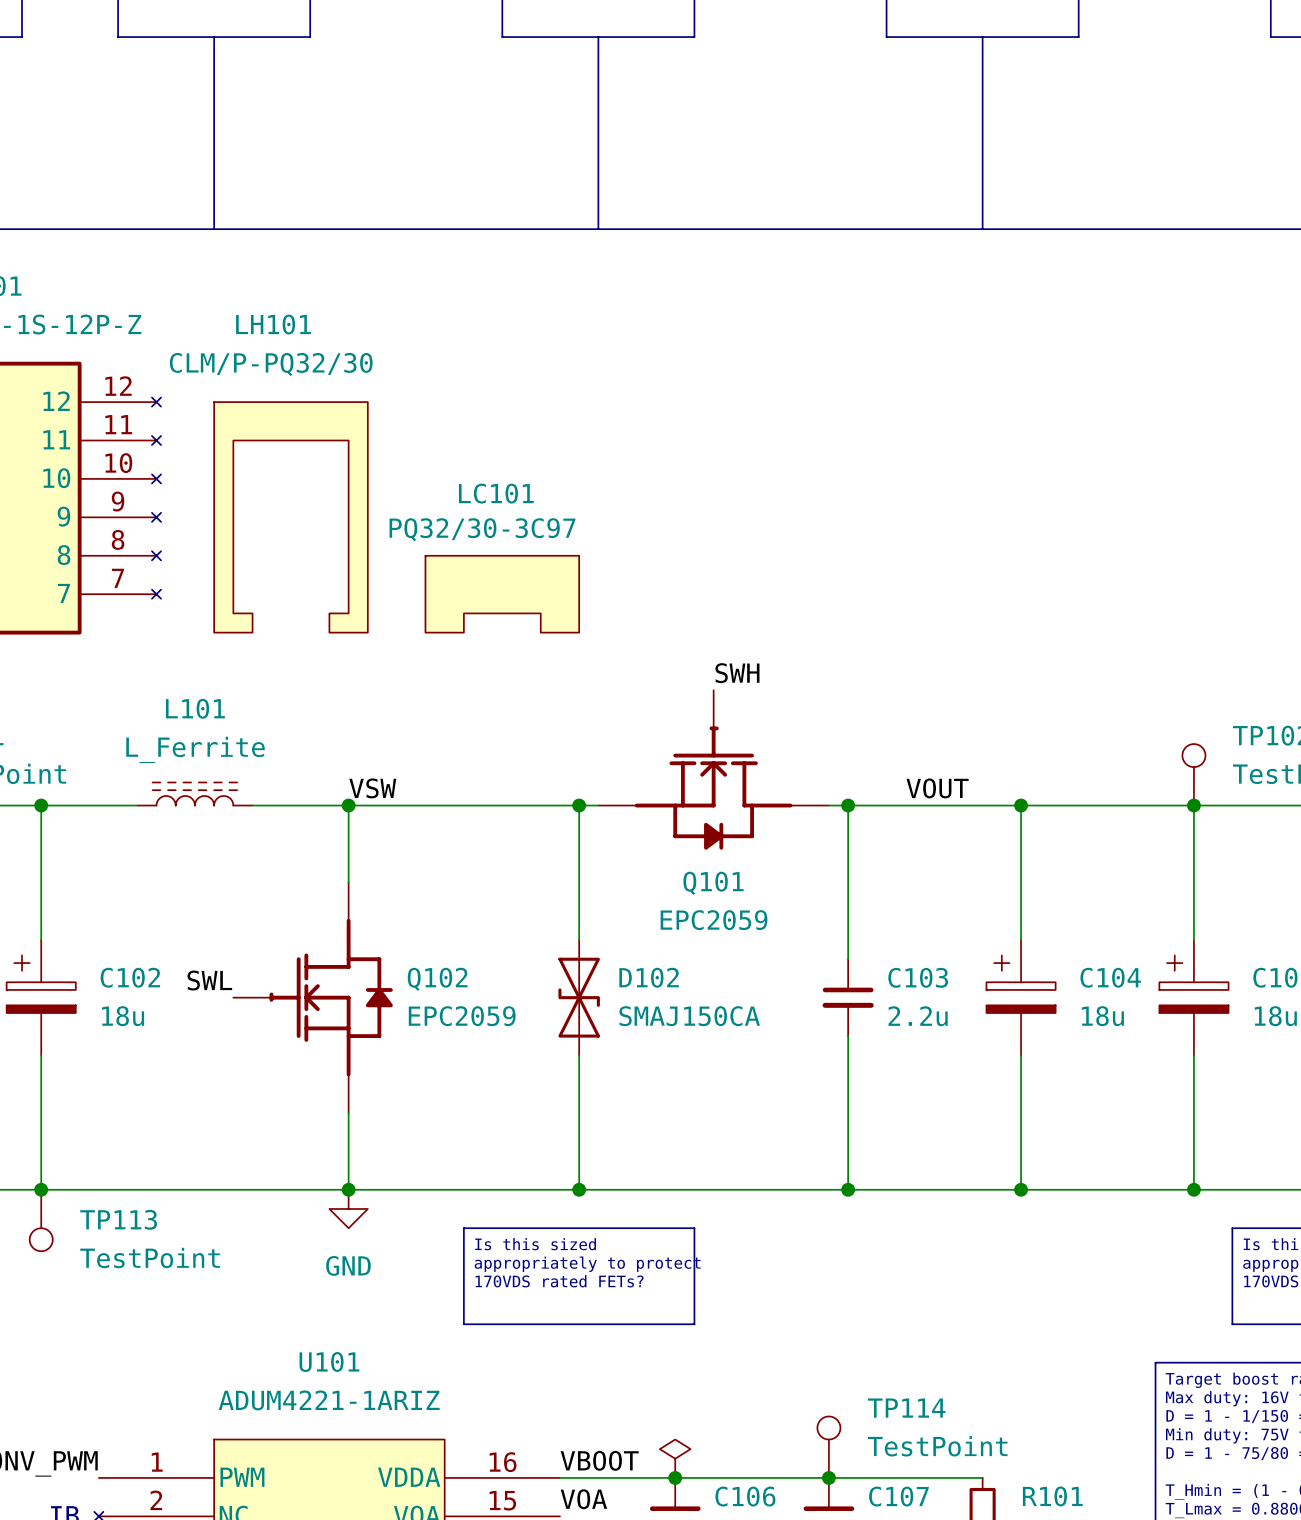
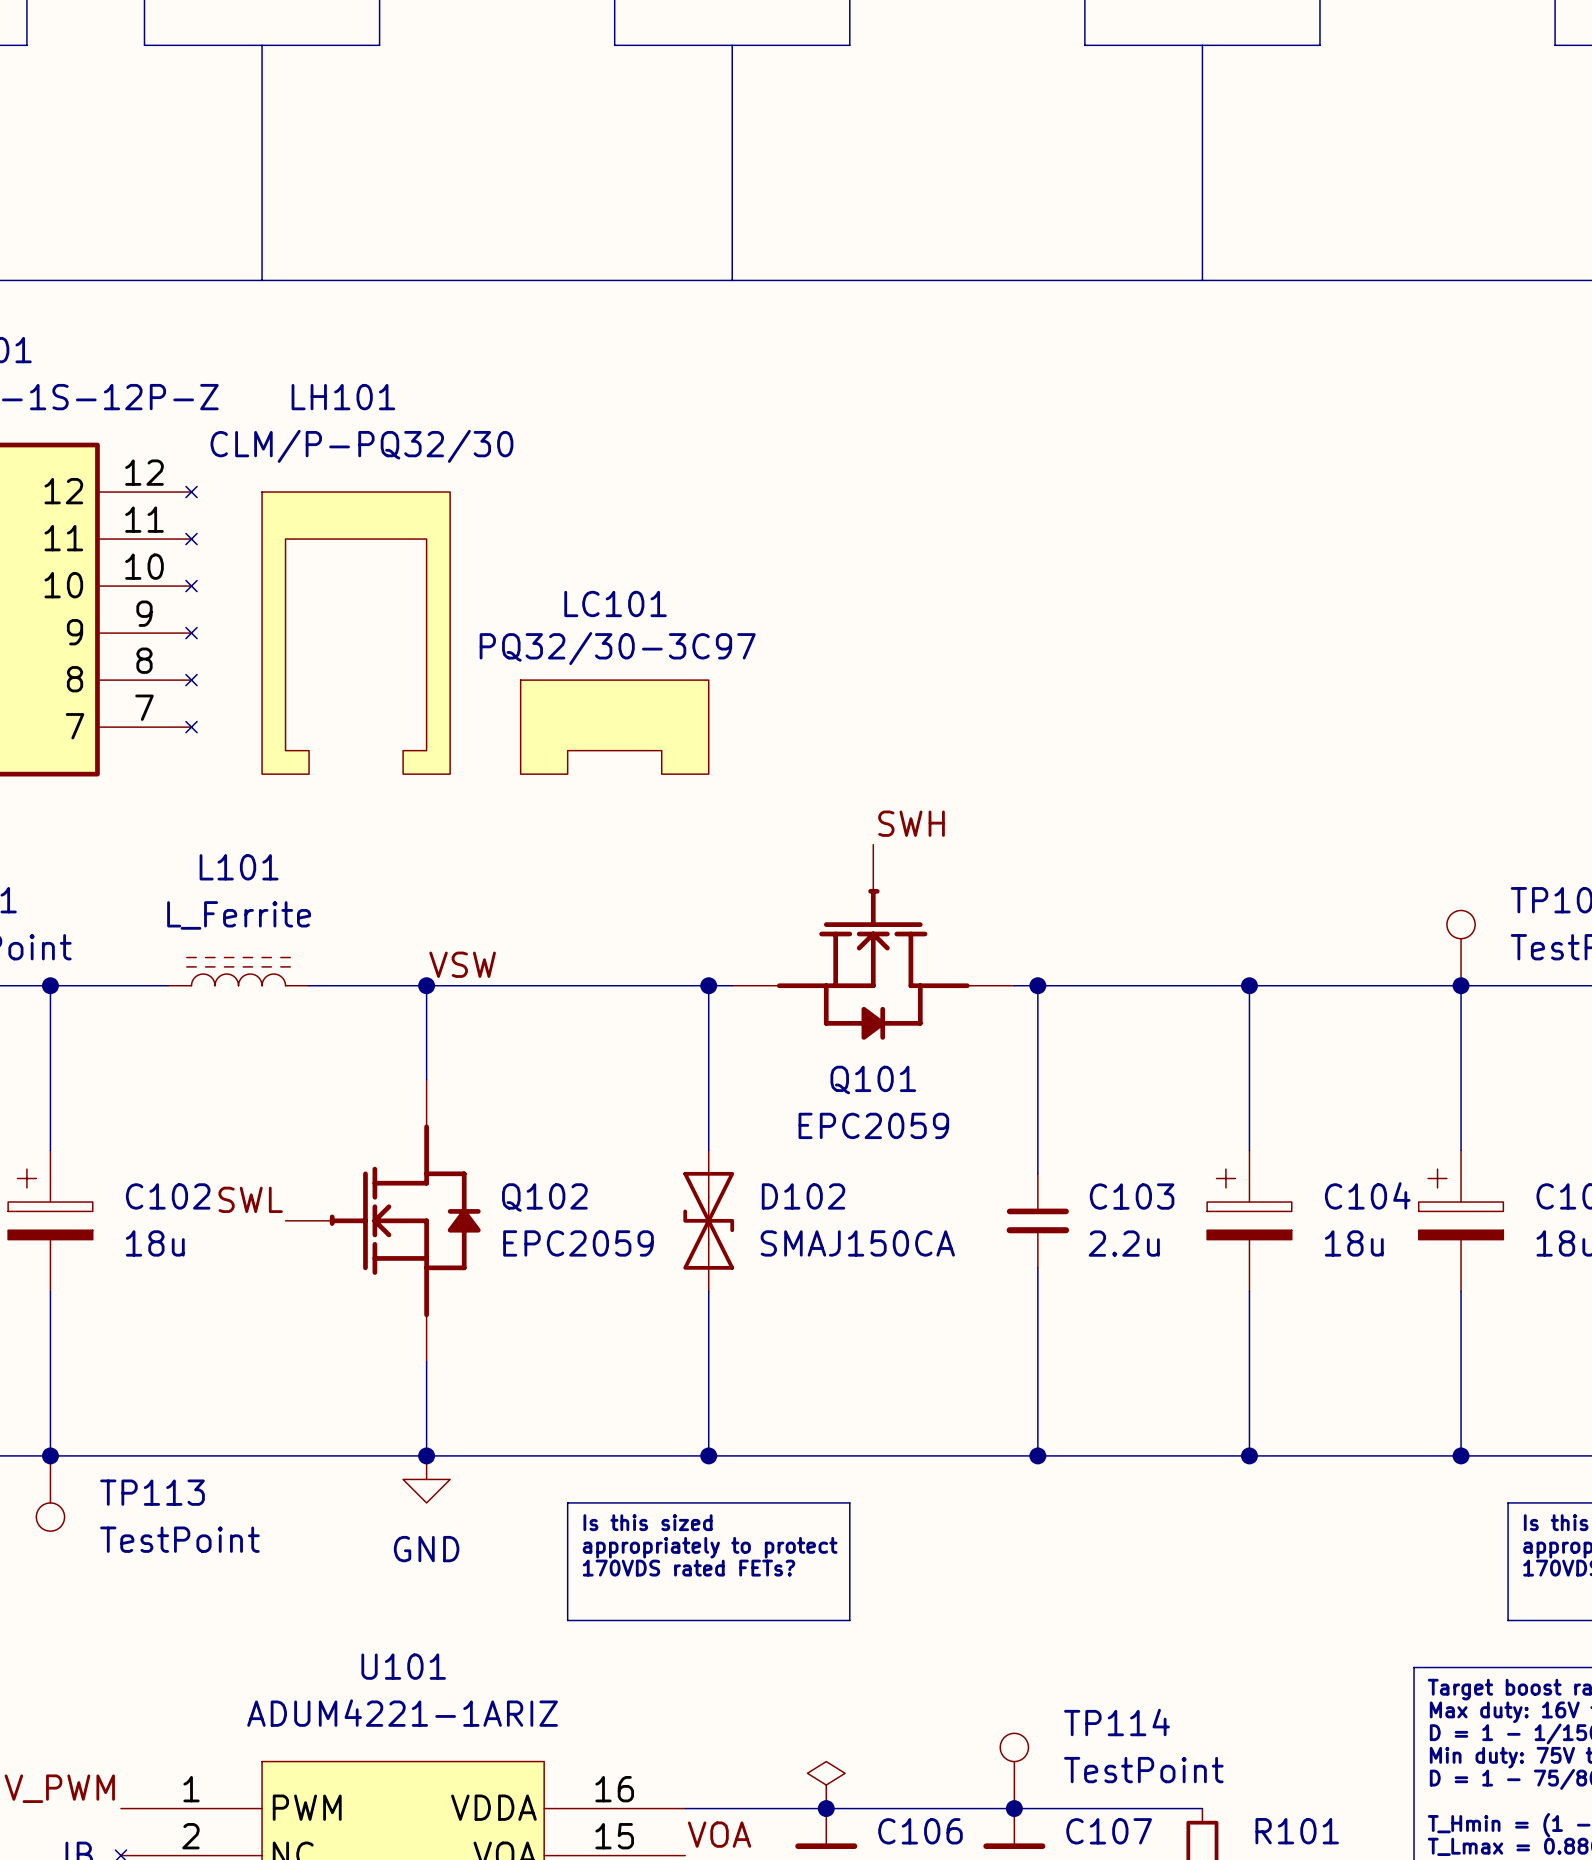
label: VOUT (937, 788) -> none
label: VBOOT (599, 1460) -> none

